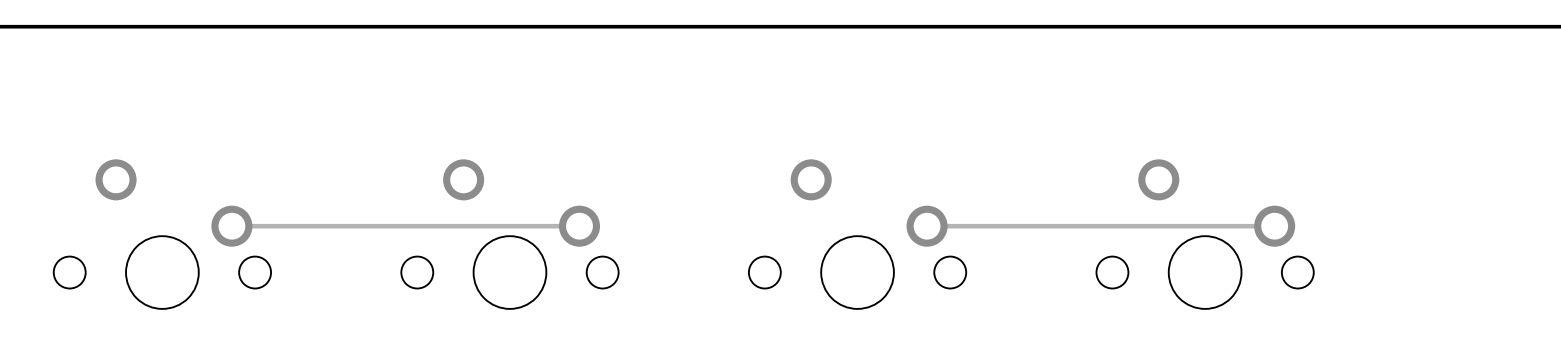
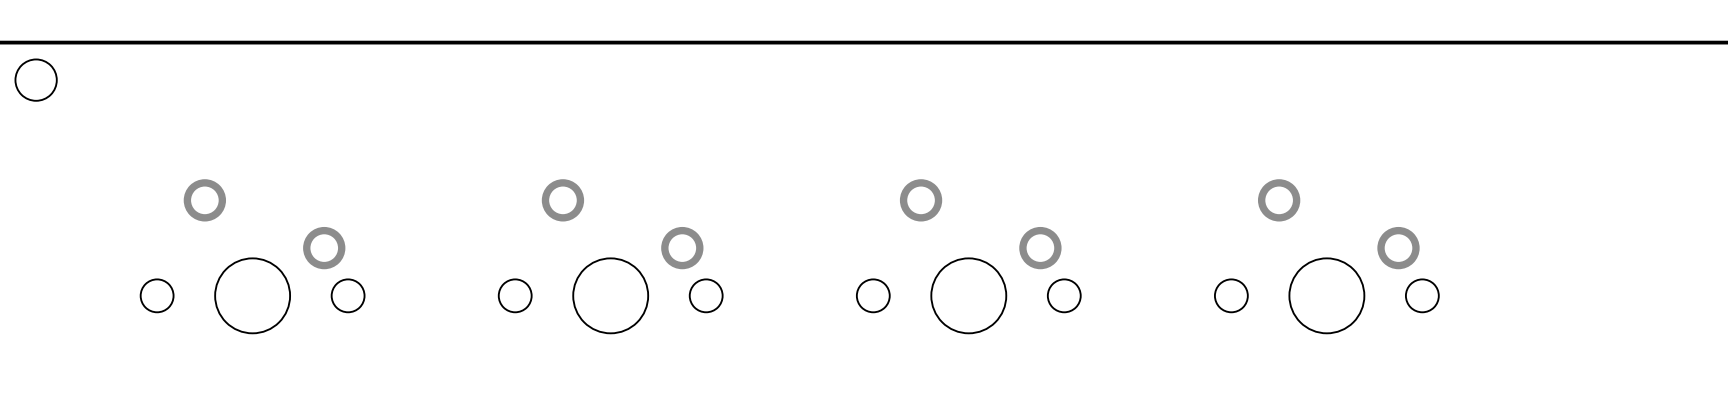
track: (579, 226) (231, 226) -> none
track: (1274, 226) (927, 226) -> none

